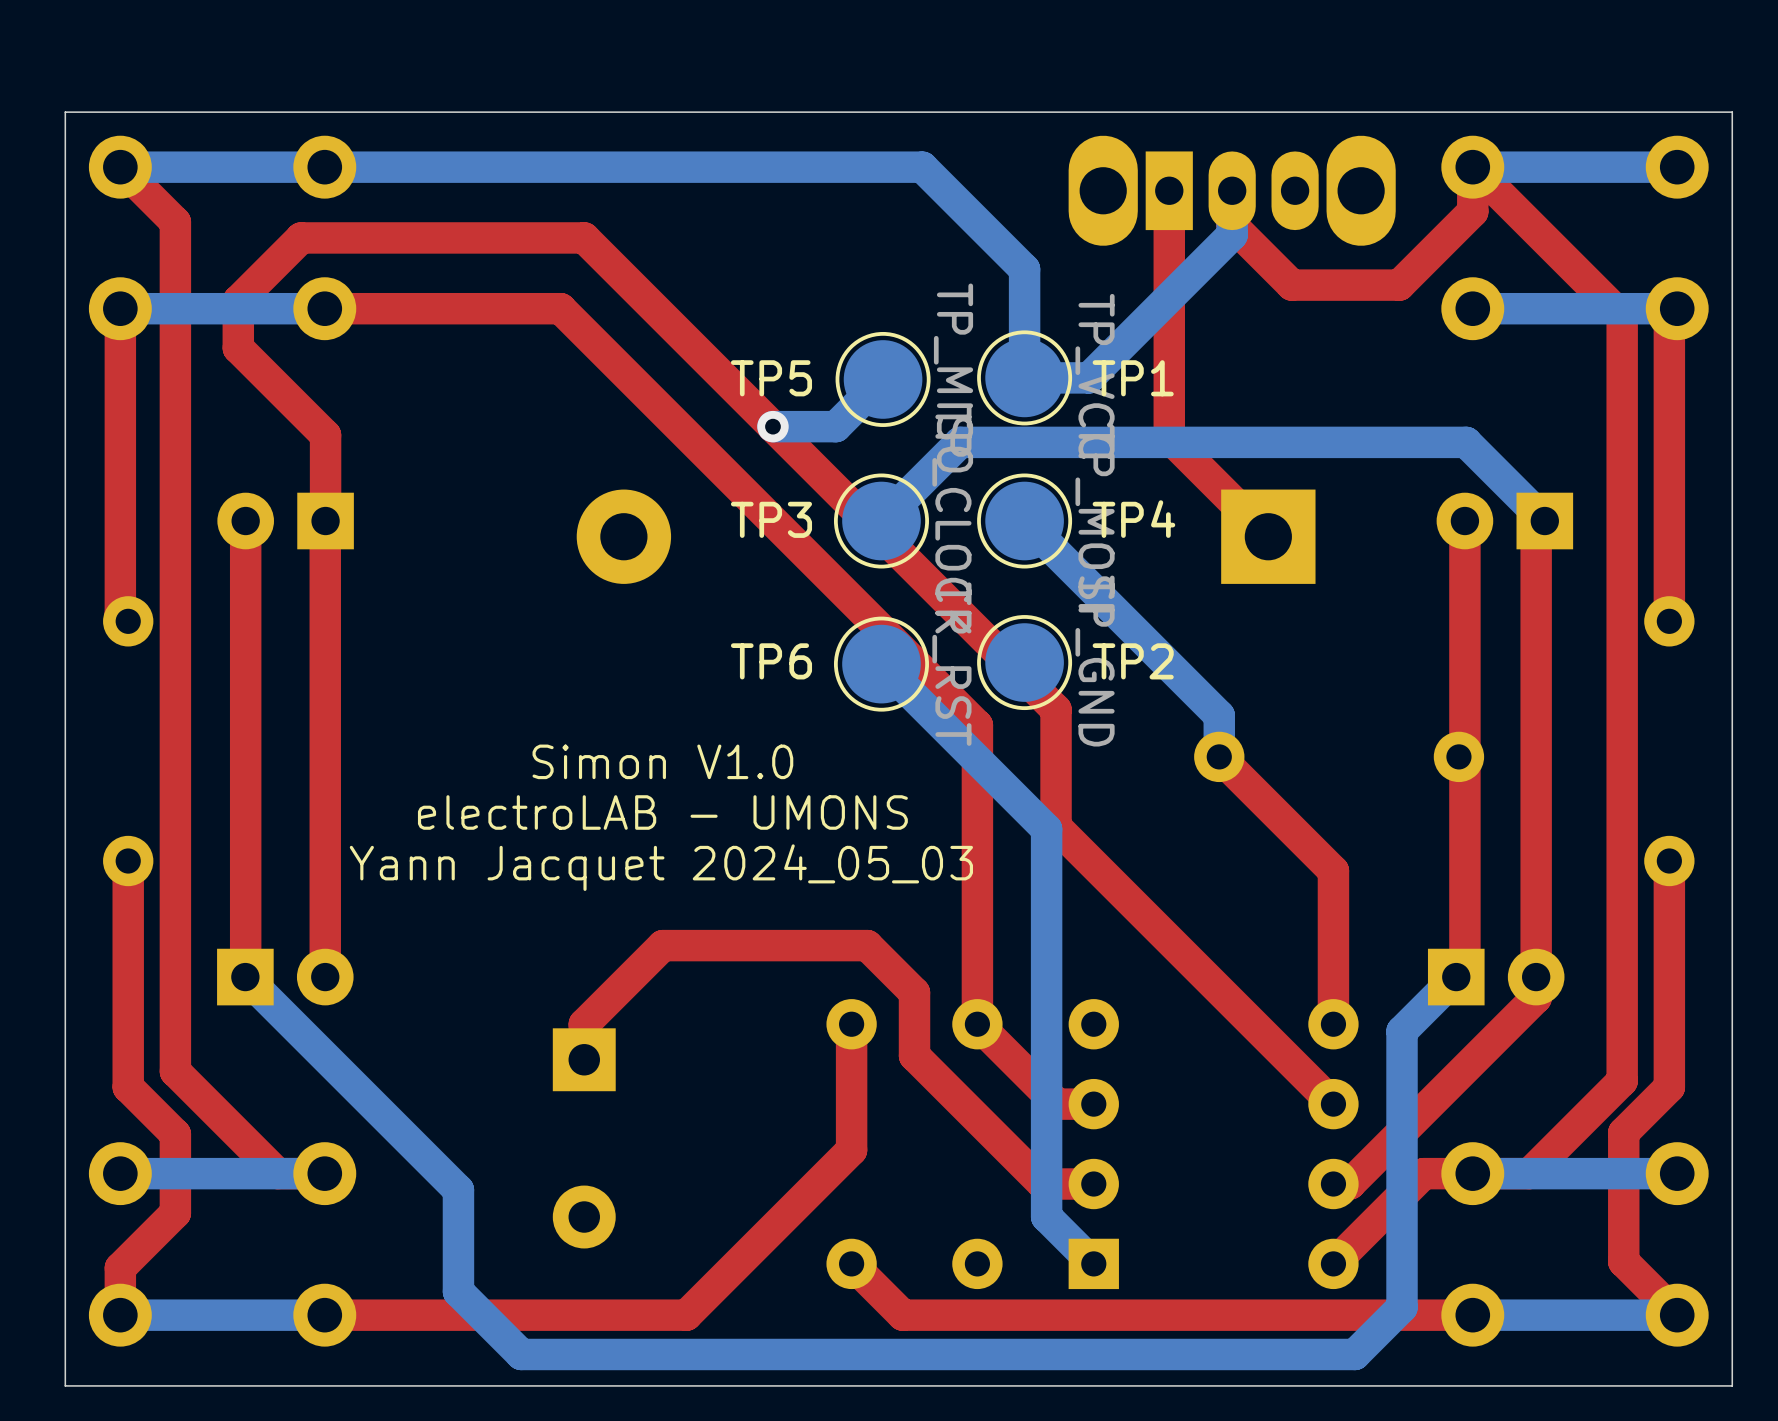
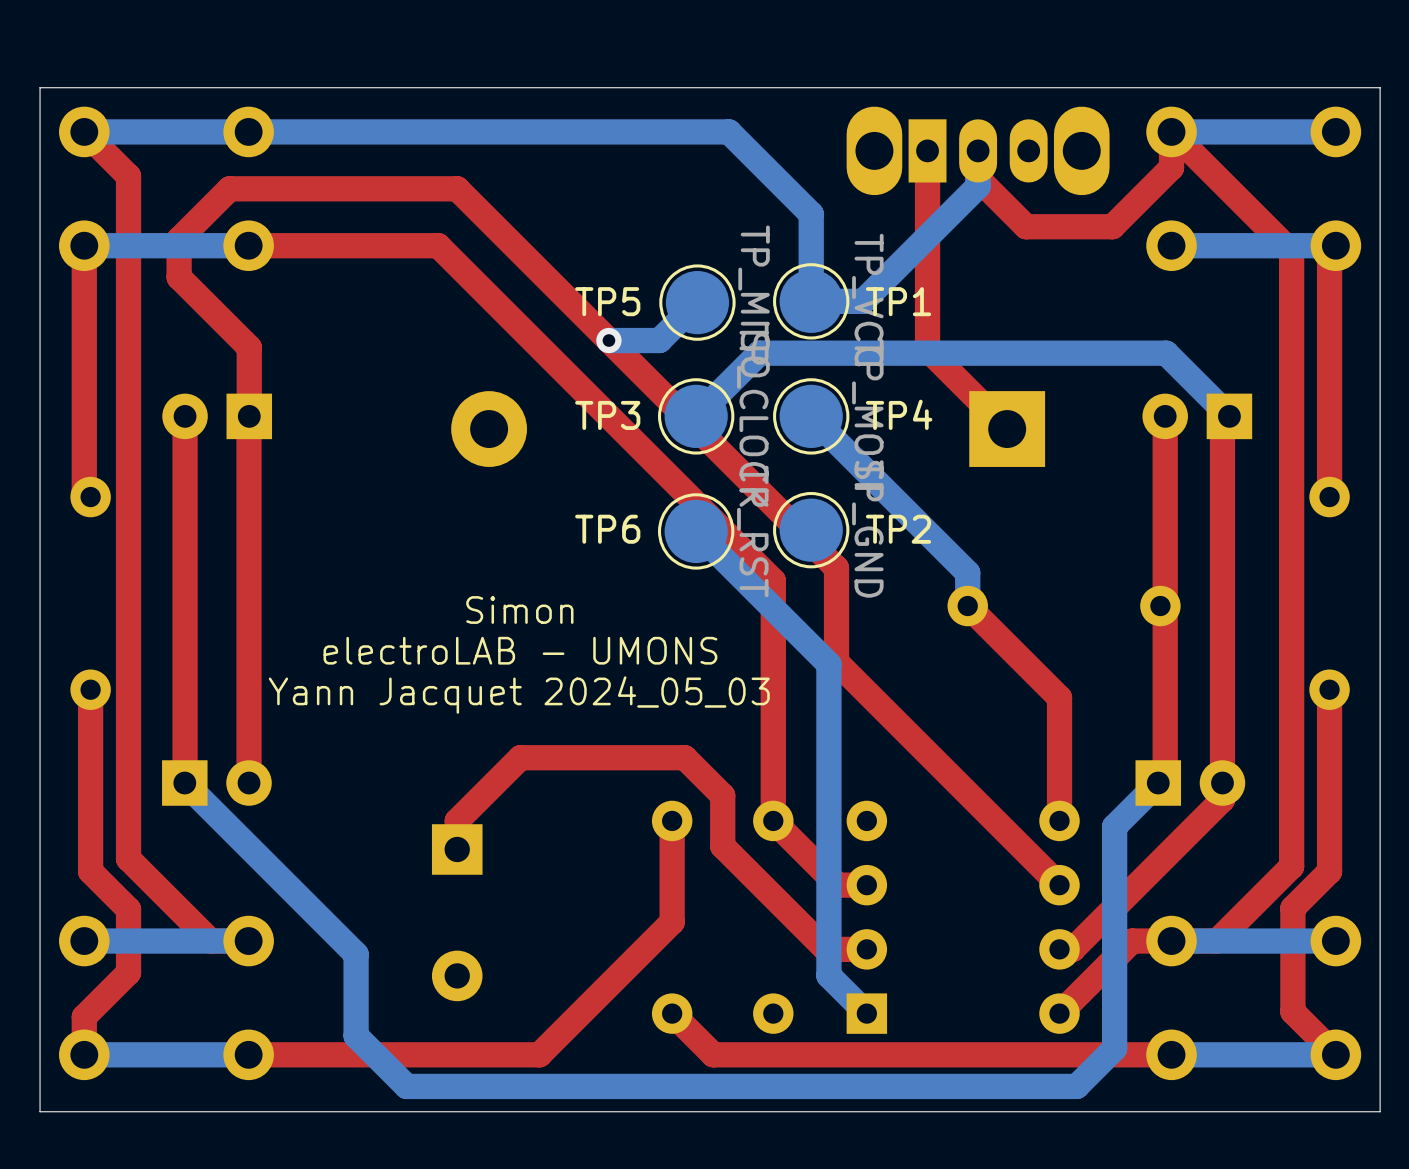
text: Simon V1.0 (662, 761) -> Simon (519, 610)

